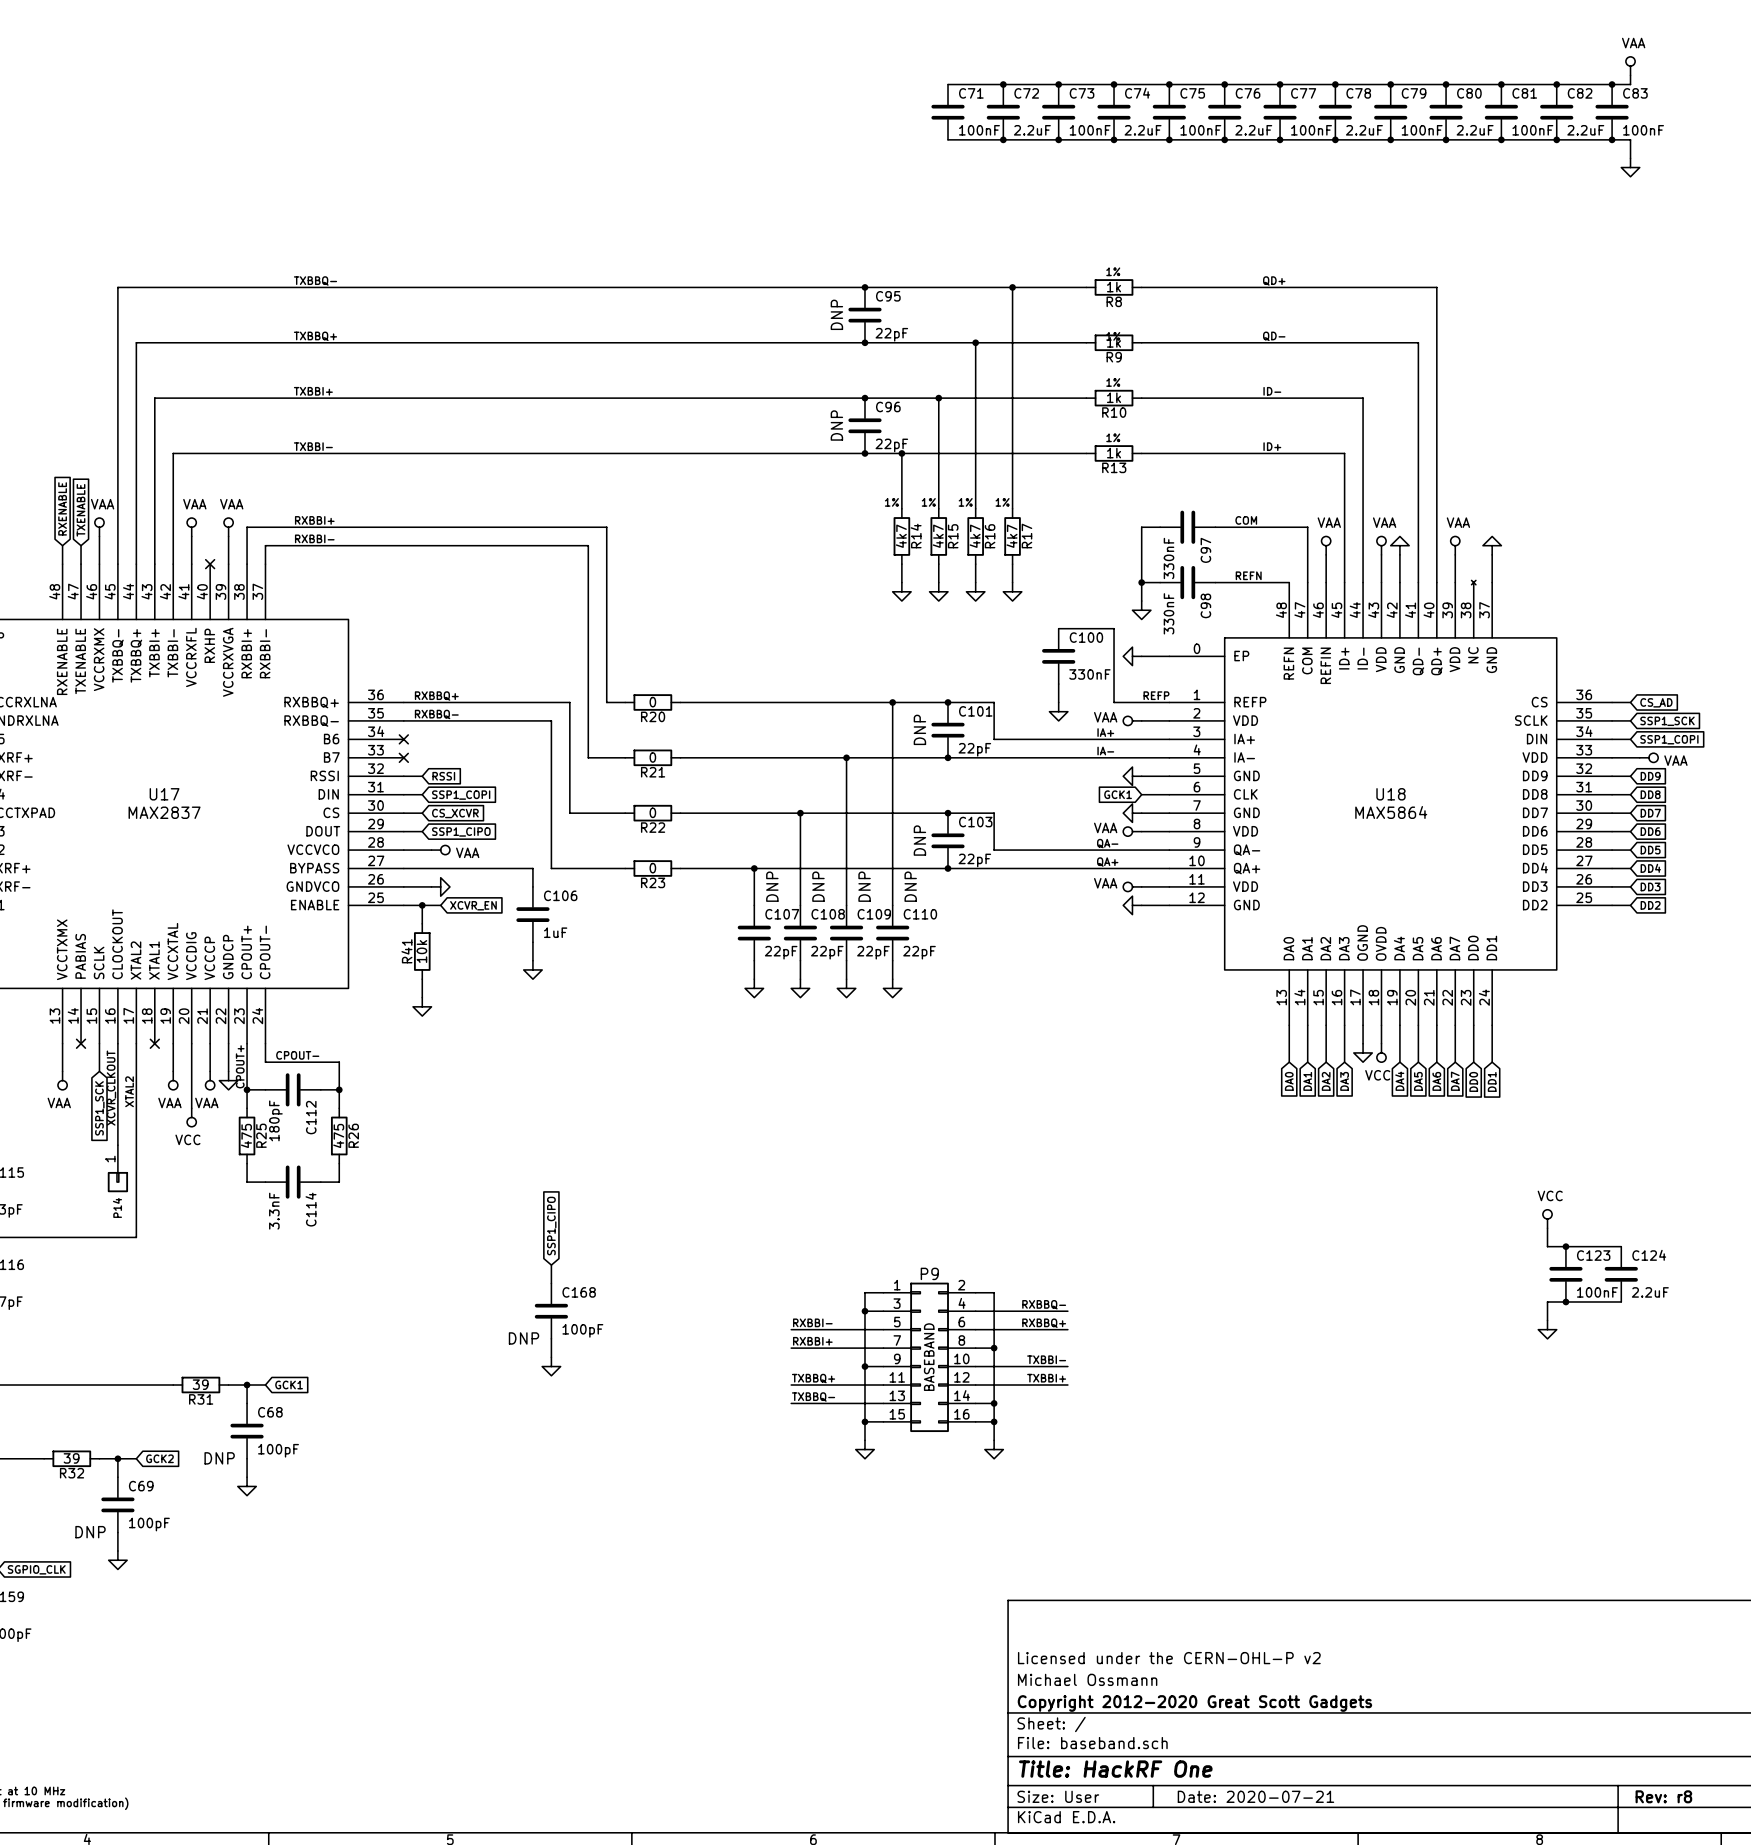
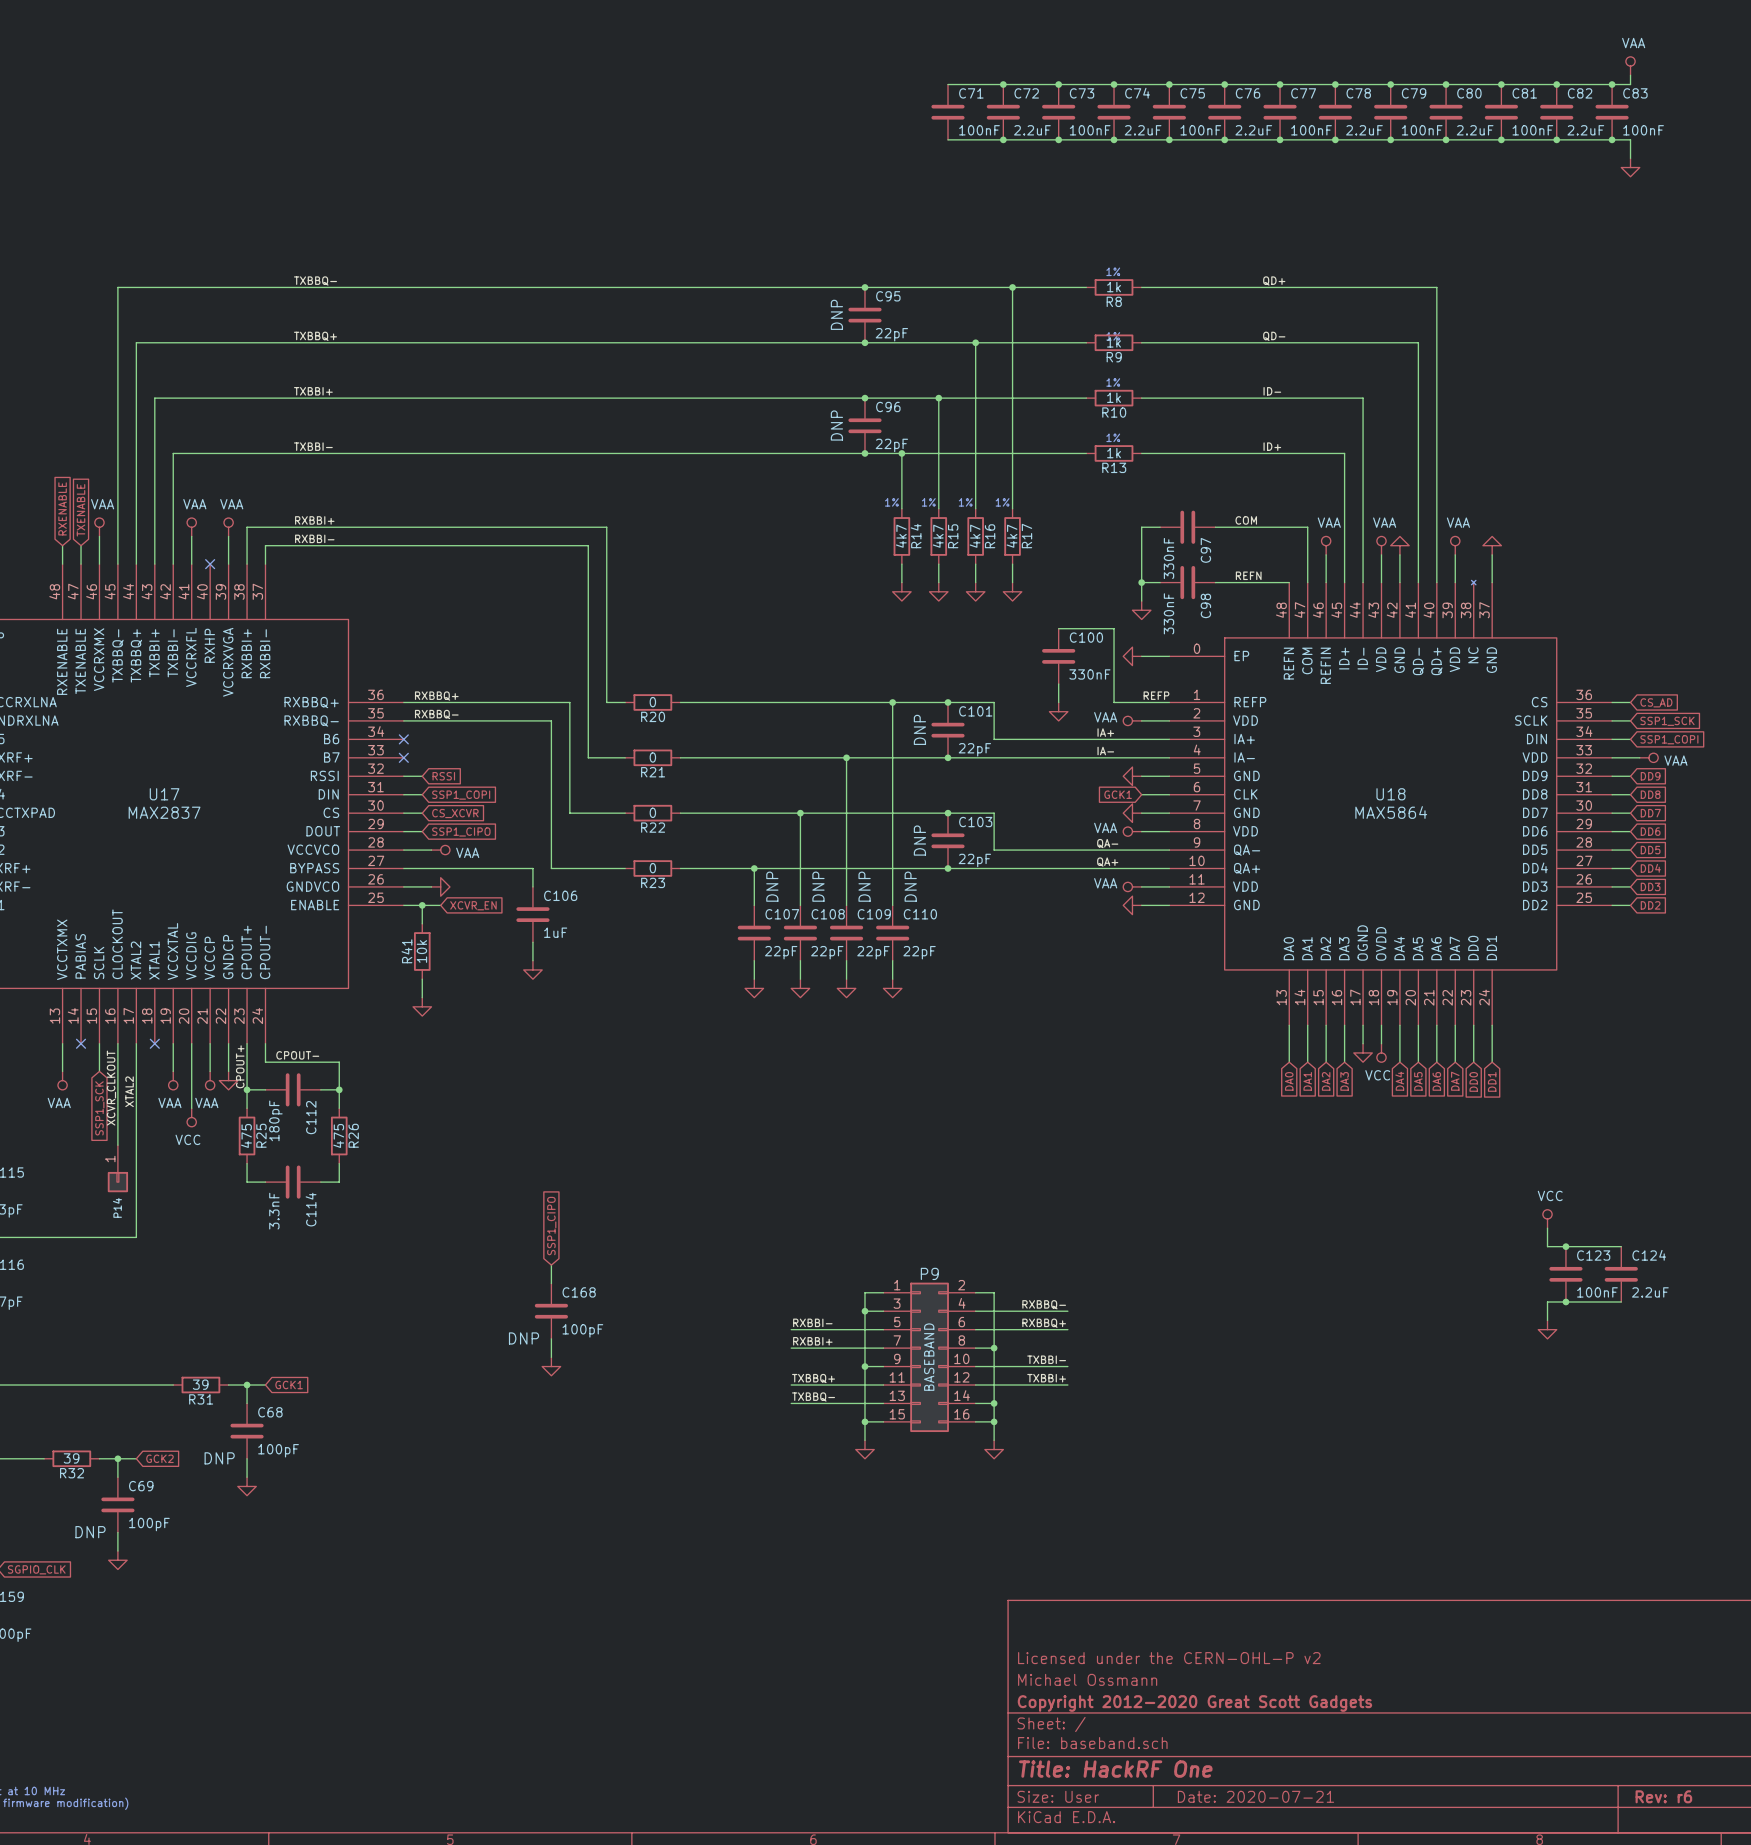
title block: Rev: r8 (1663, 1796) -> Rev: r6 (1663, 1796)

